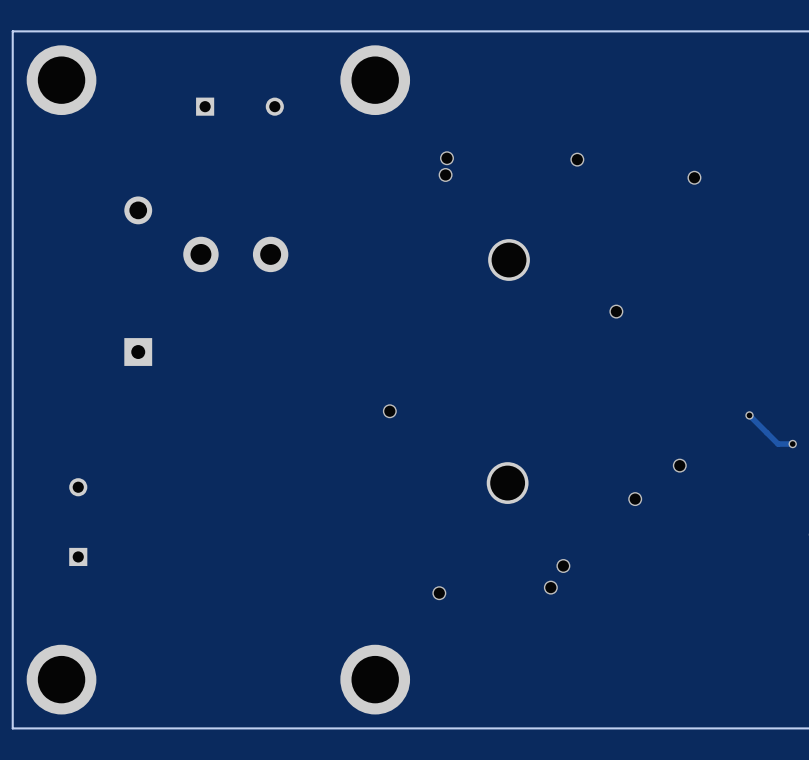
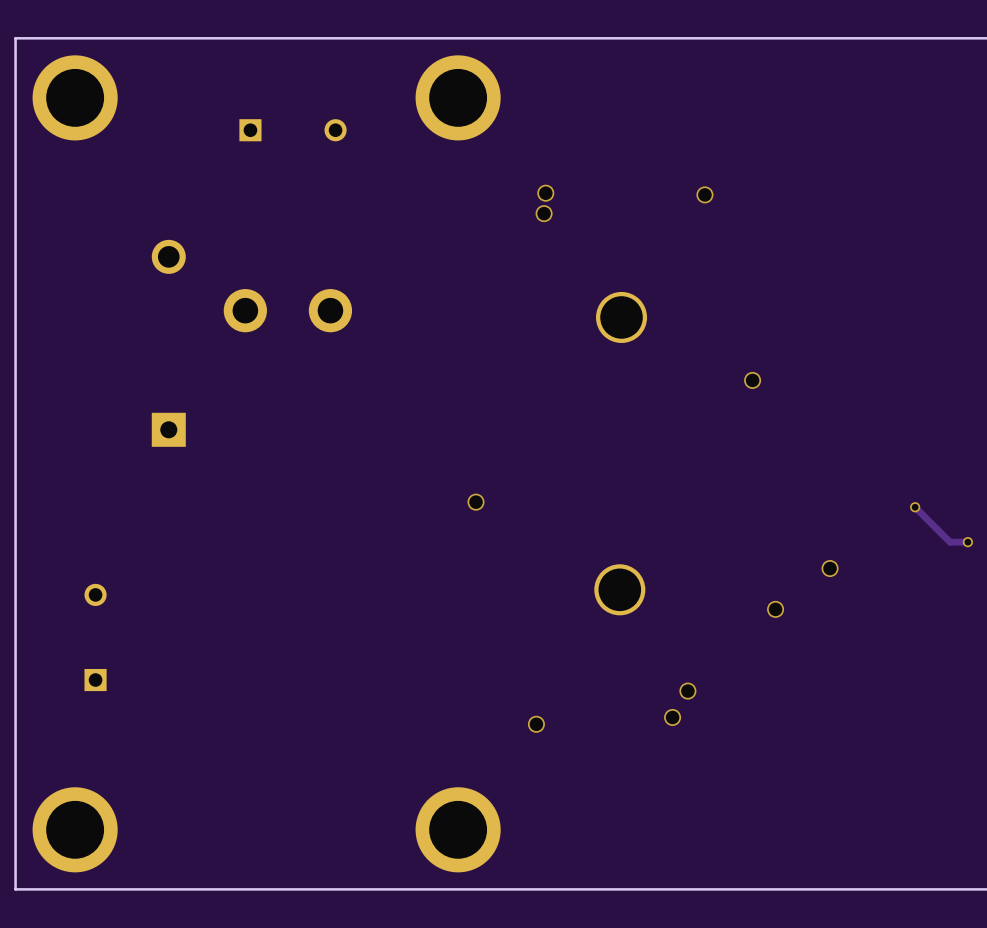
via: (694, 177) -> none

